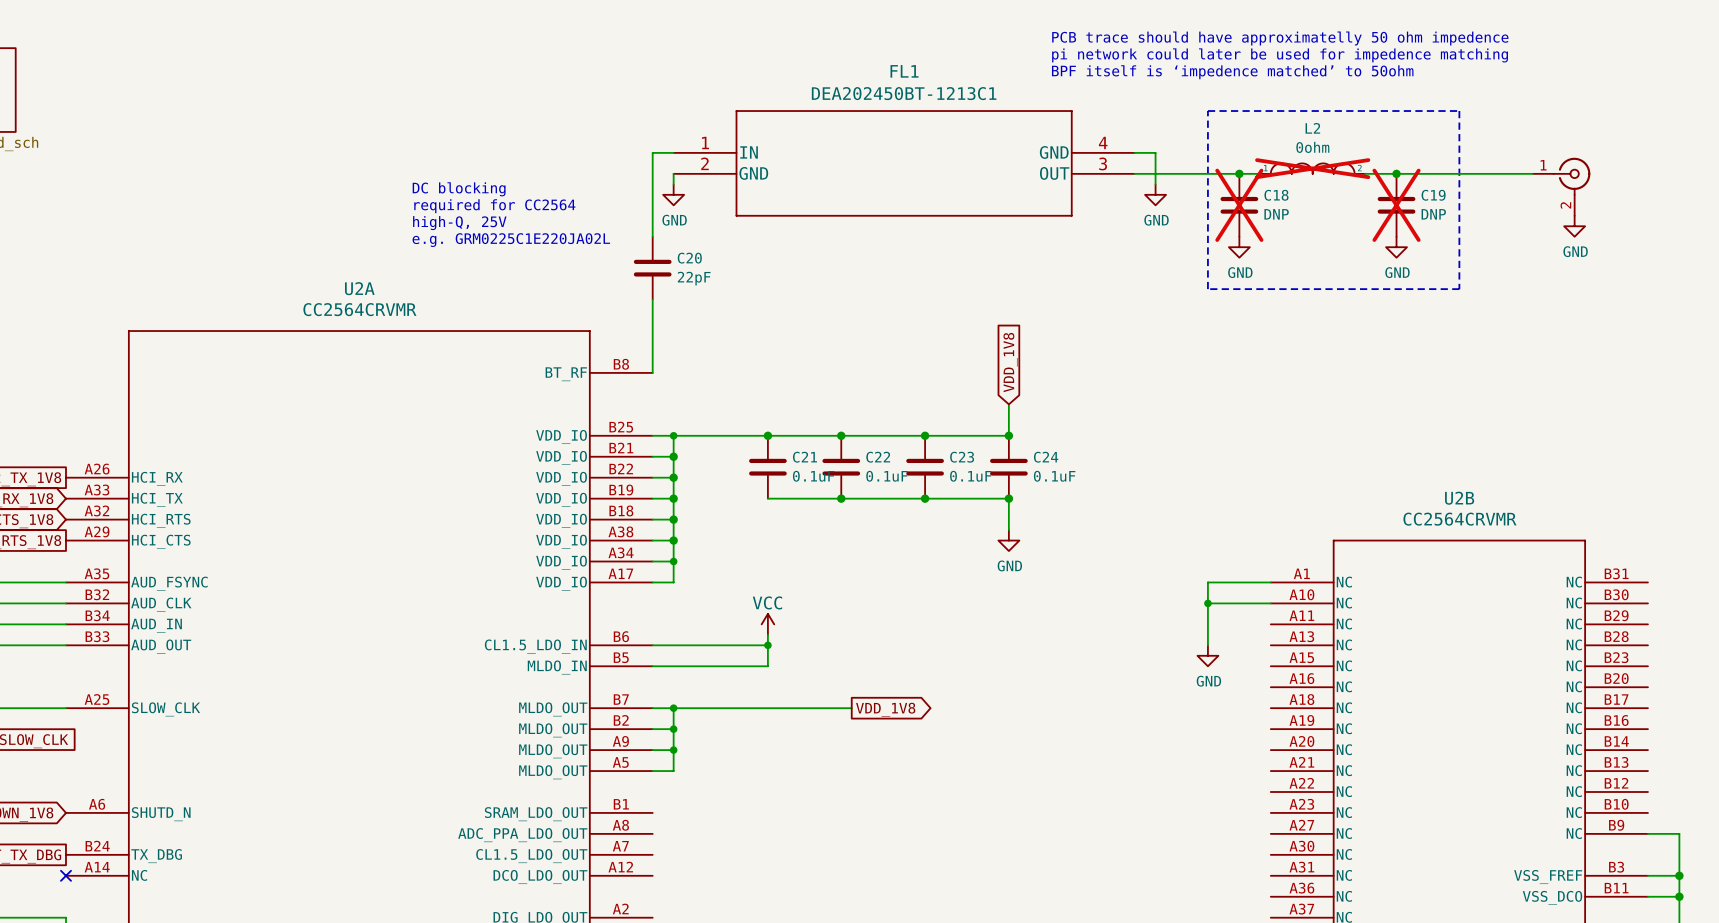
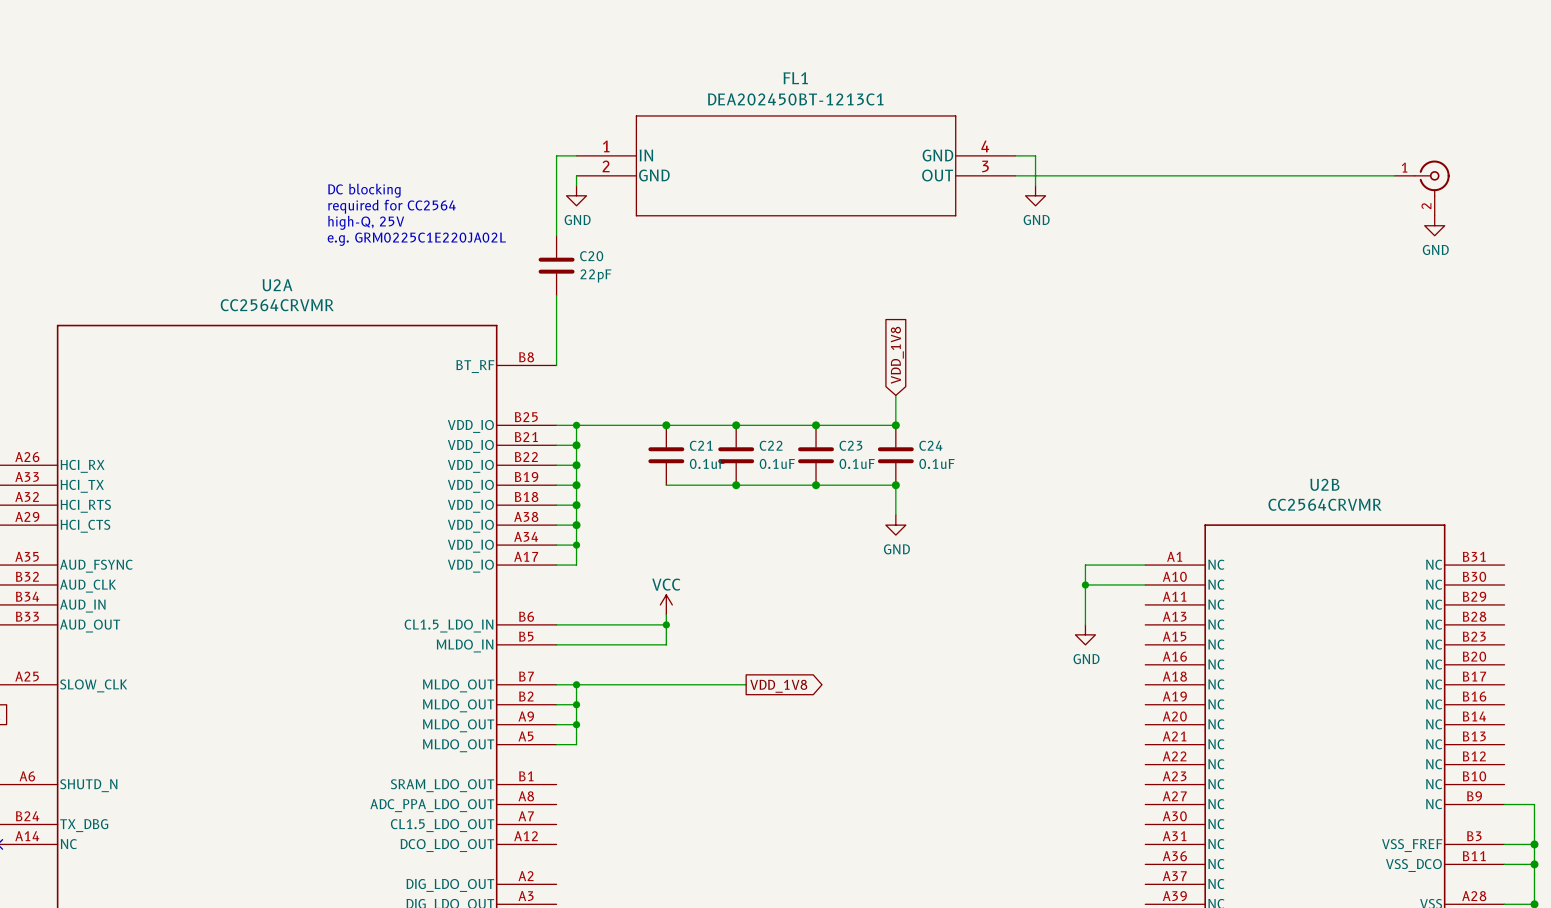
text: PCB trace should have approximatelly 50 ohm impedence (1280, 38) -> none
text: pi network could later be used for impedence matching (1280, 55) -> none
text: BPF itself is ‘impedence matched’ to 50ohm (1232, 72) -> none
line: (1207, 111) (1207, 289) (1459, 289) (1459, 111) (1207, 111) -> none
L2: 0ohm (1312, 168) -> none
junction: (1239, 173) -> none
junction: (1396, 173) -> none
C18: DNP (1239, 205) -> none
C19: DNP (1396, 205) -> none
power symbol: GND (1239, 247) -> none
power symbol: GND (1396, 247) -> none

